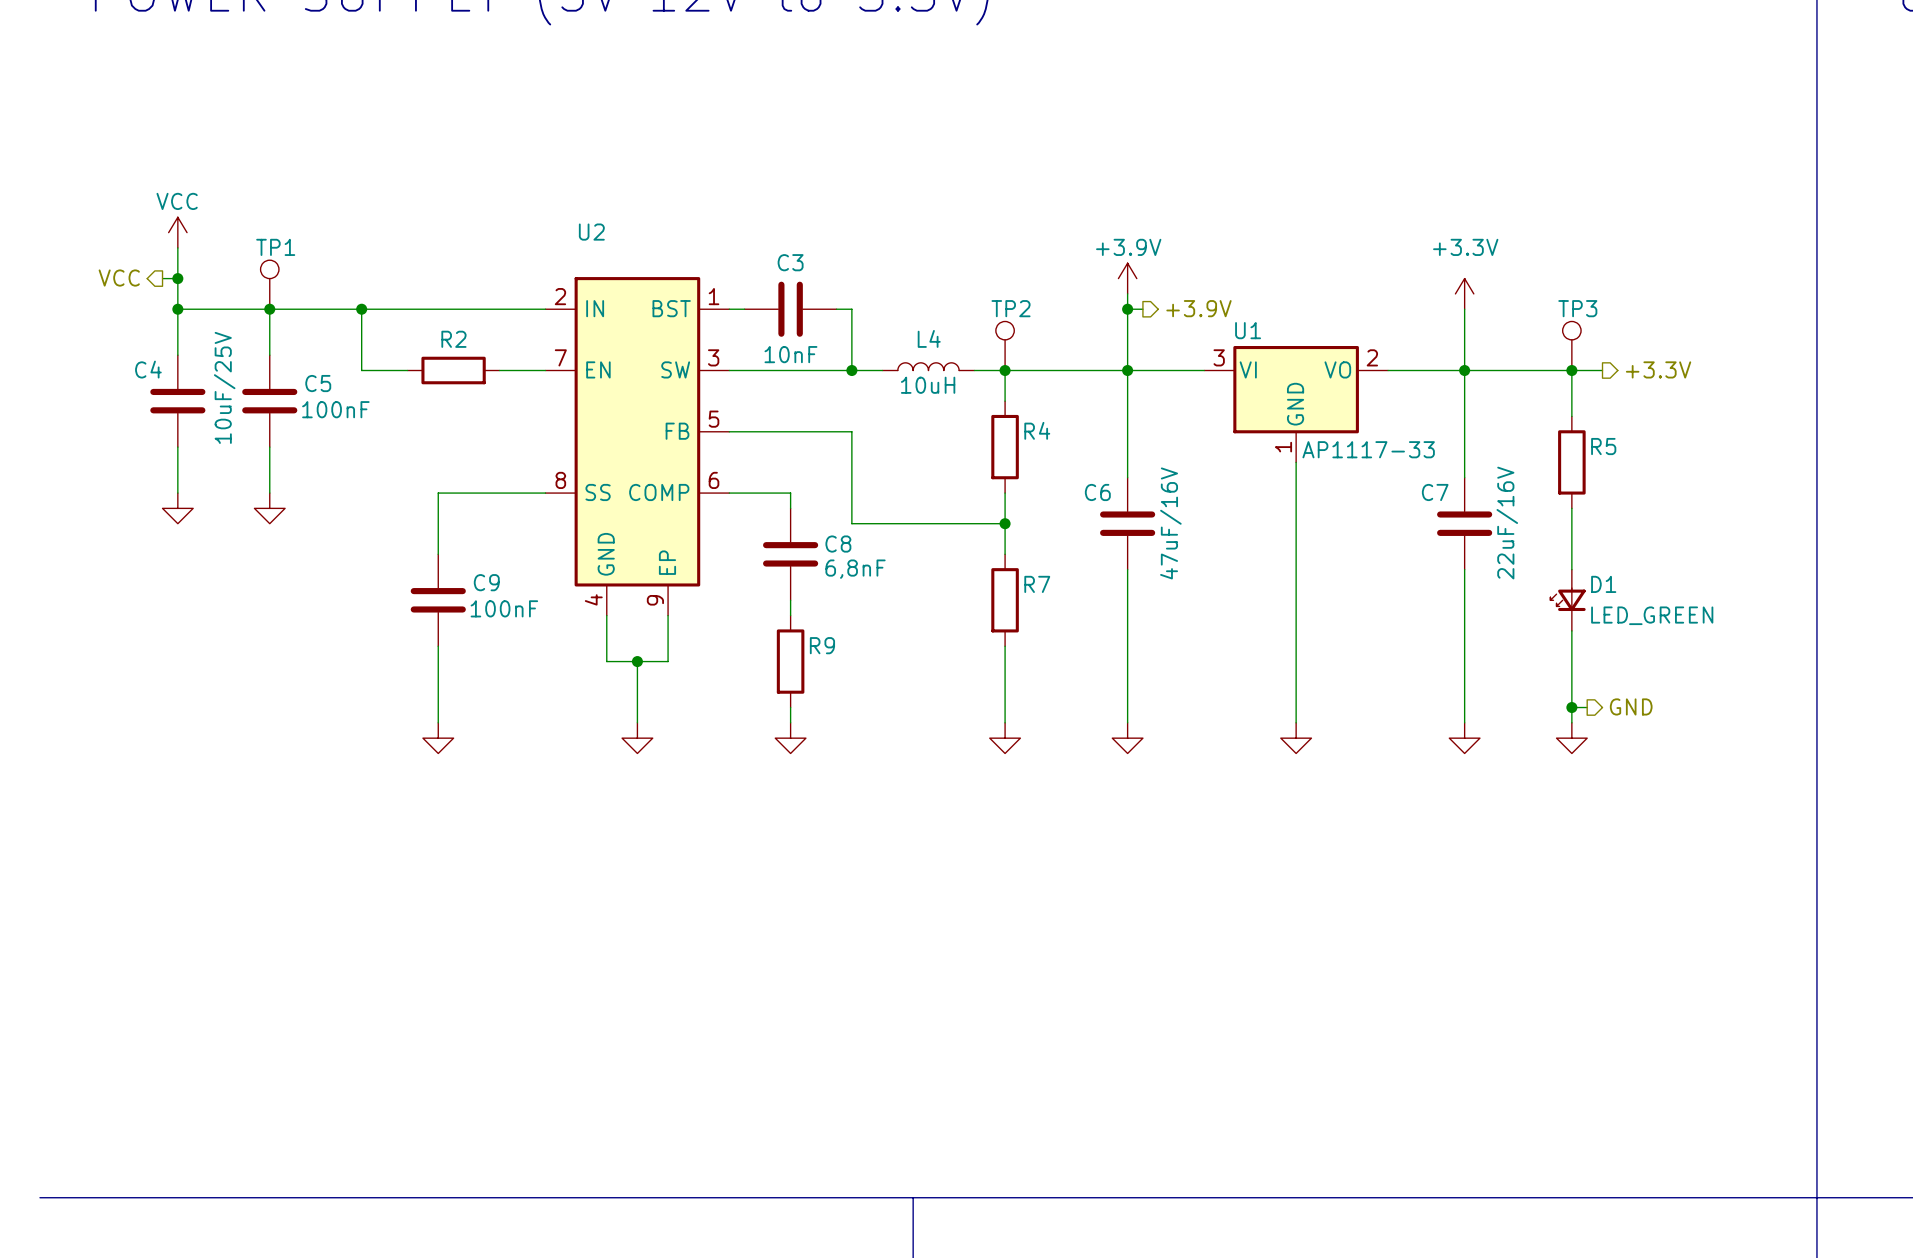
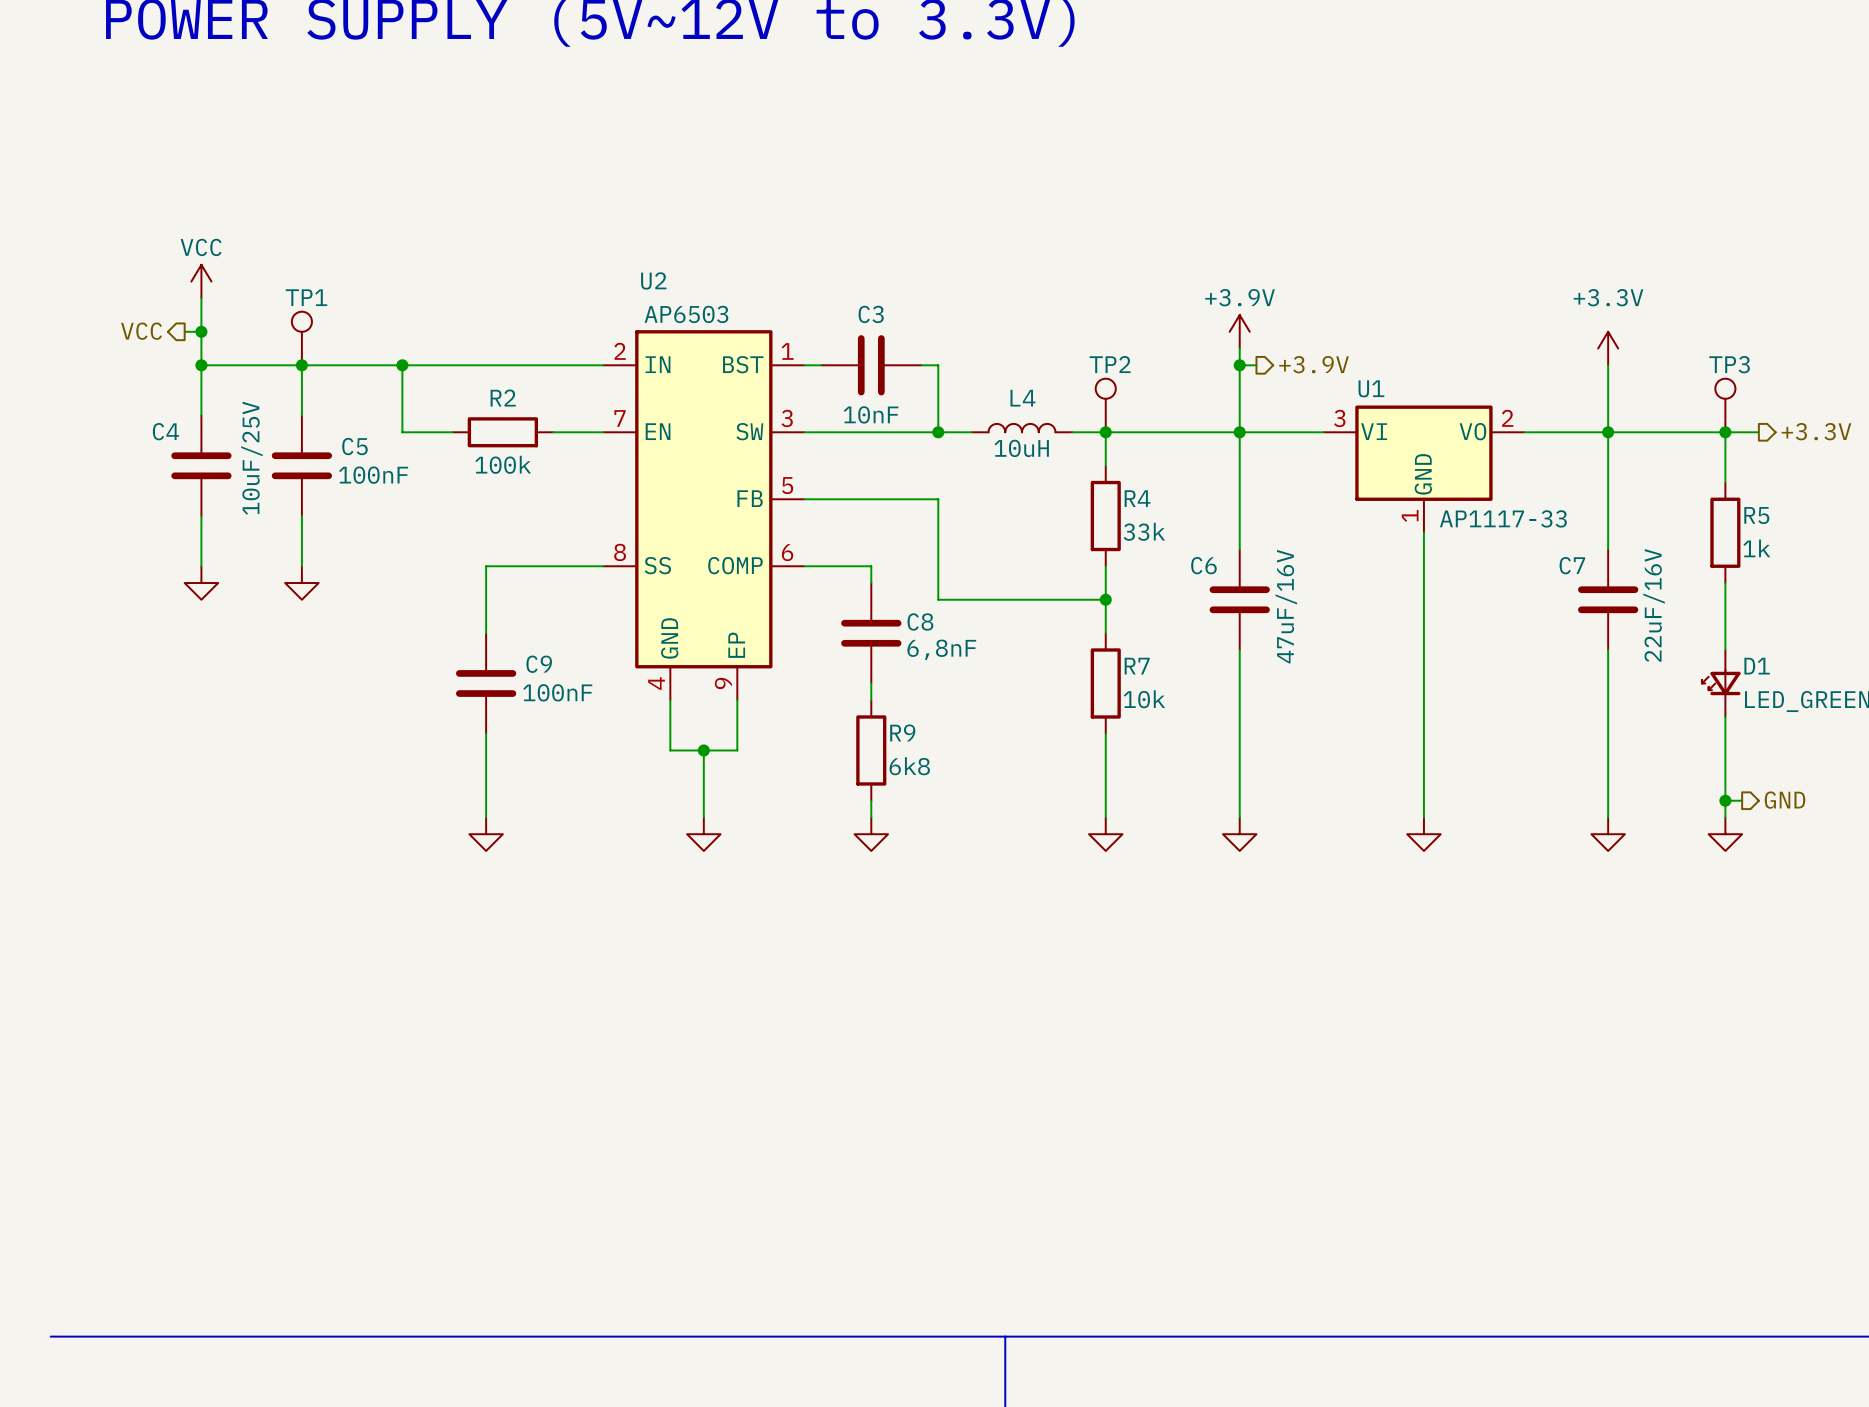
U2 value: none -> AP6503 (686, 314)
R2 value: none -> 100k (503, 464)
R4 value: none -> 33k (1144, 531)
R5 value: none -> 1k (1756, 548)
R7 value: none -> 10k (1144, 699)
R9 value: none -> 6k8 (909, 766)

